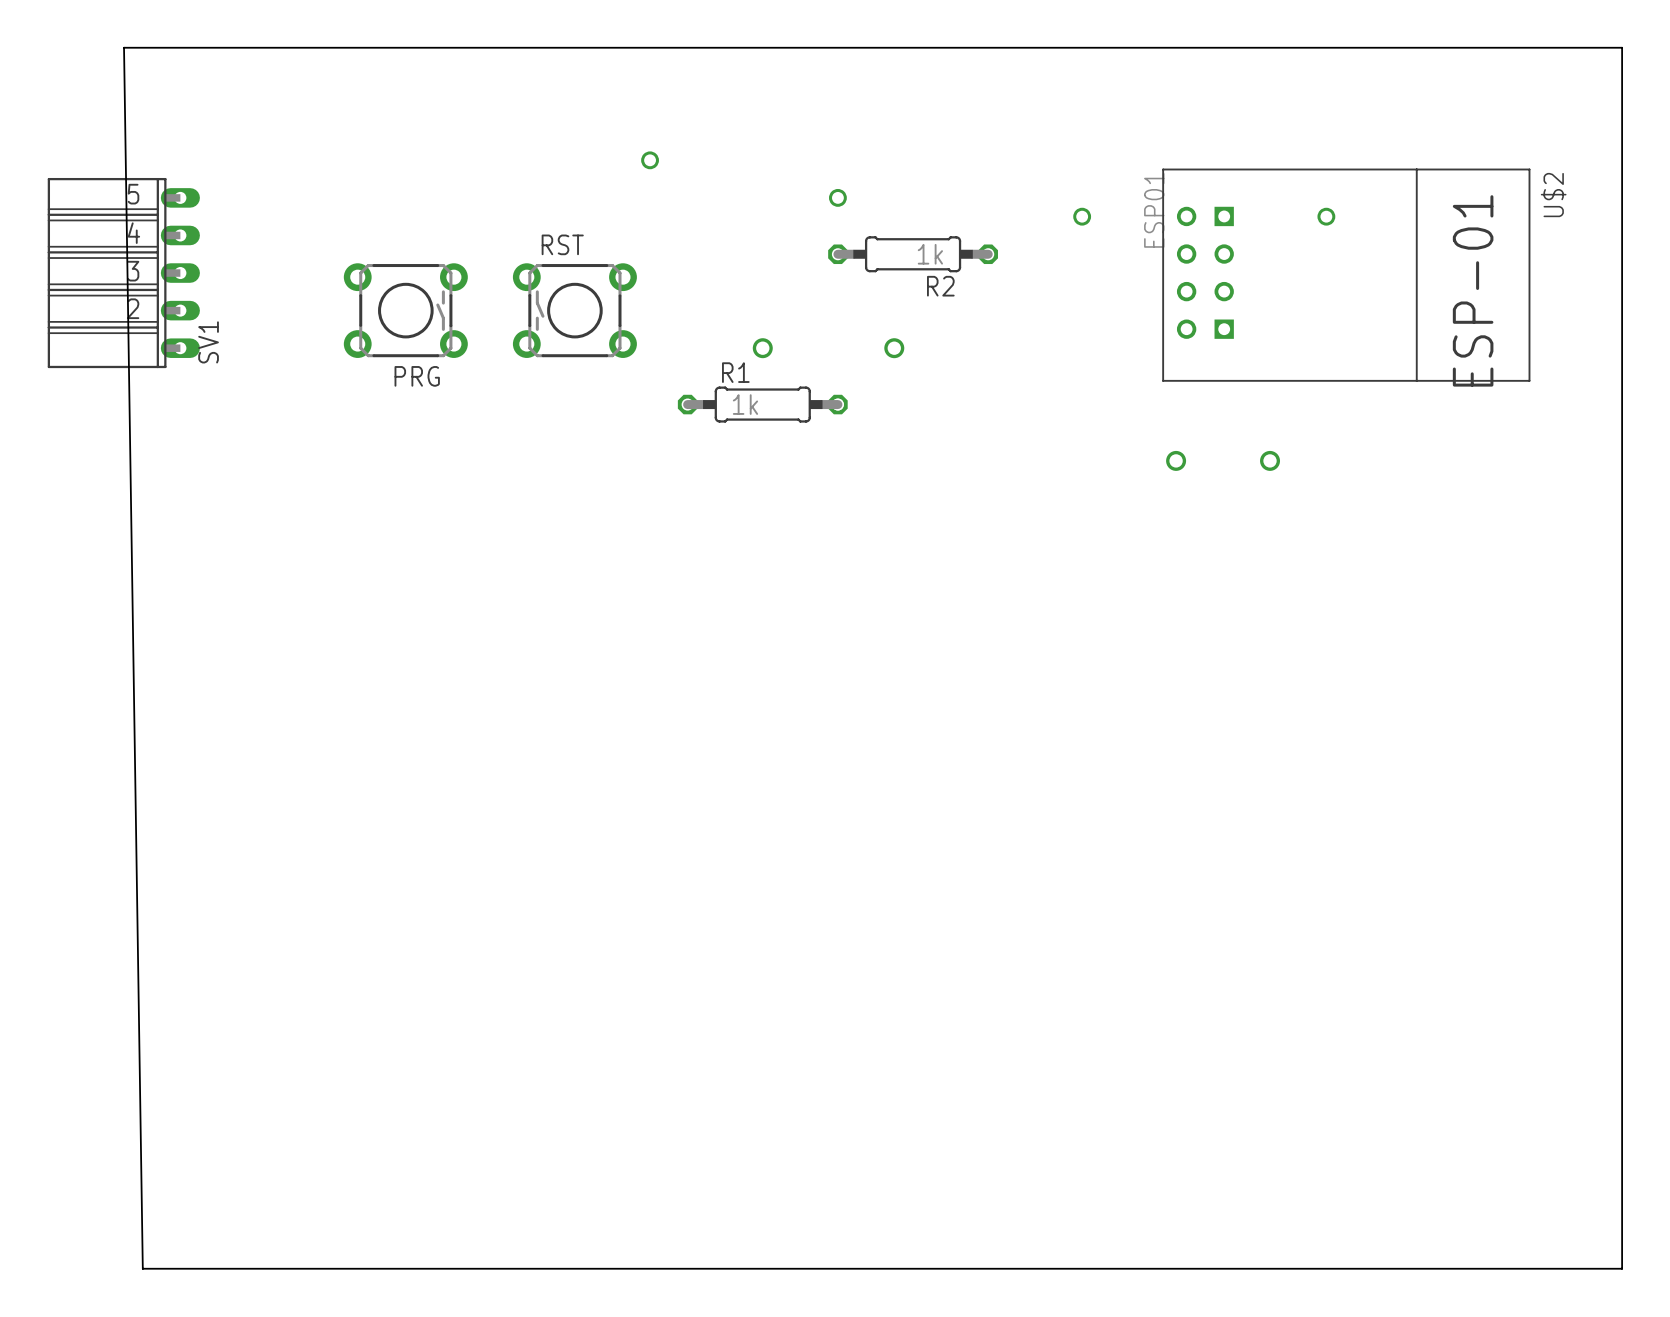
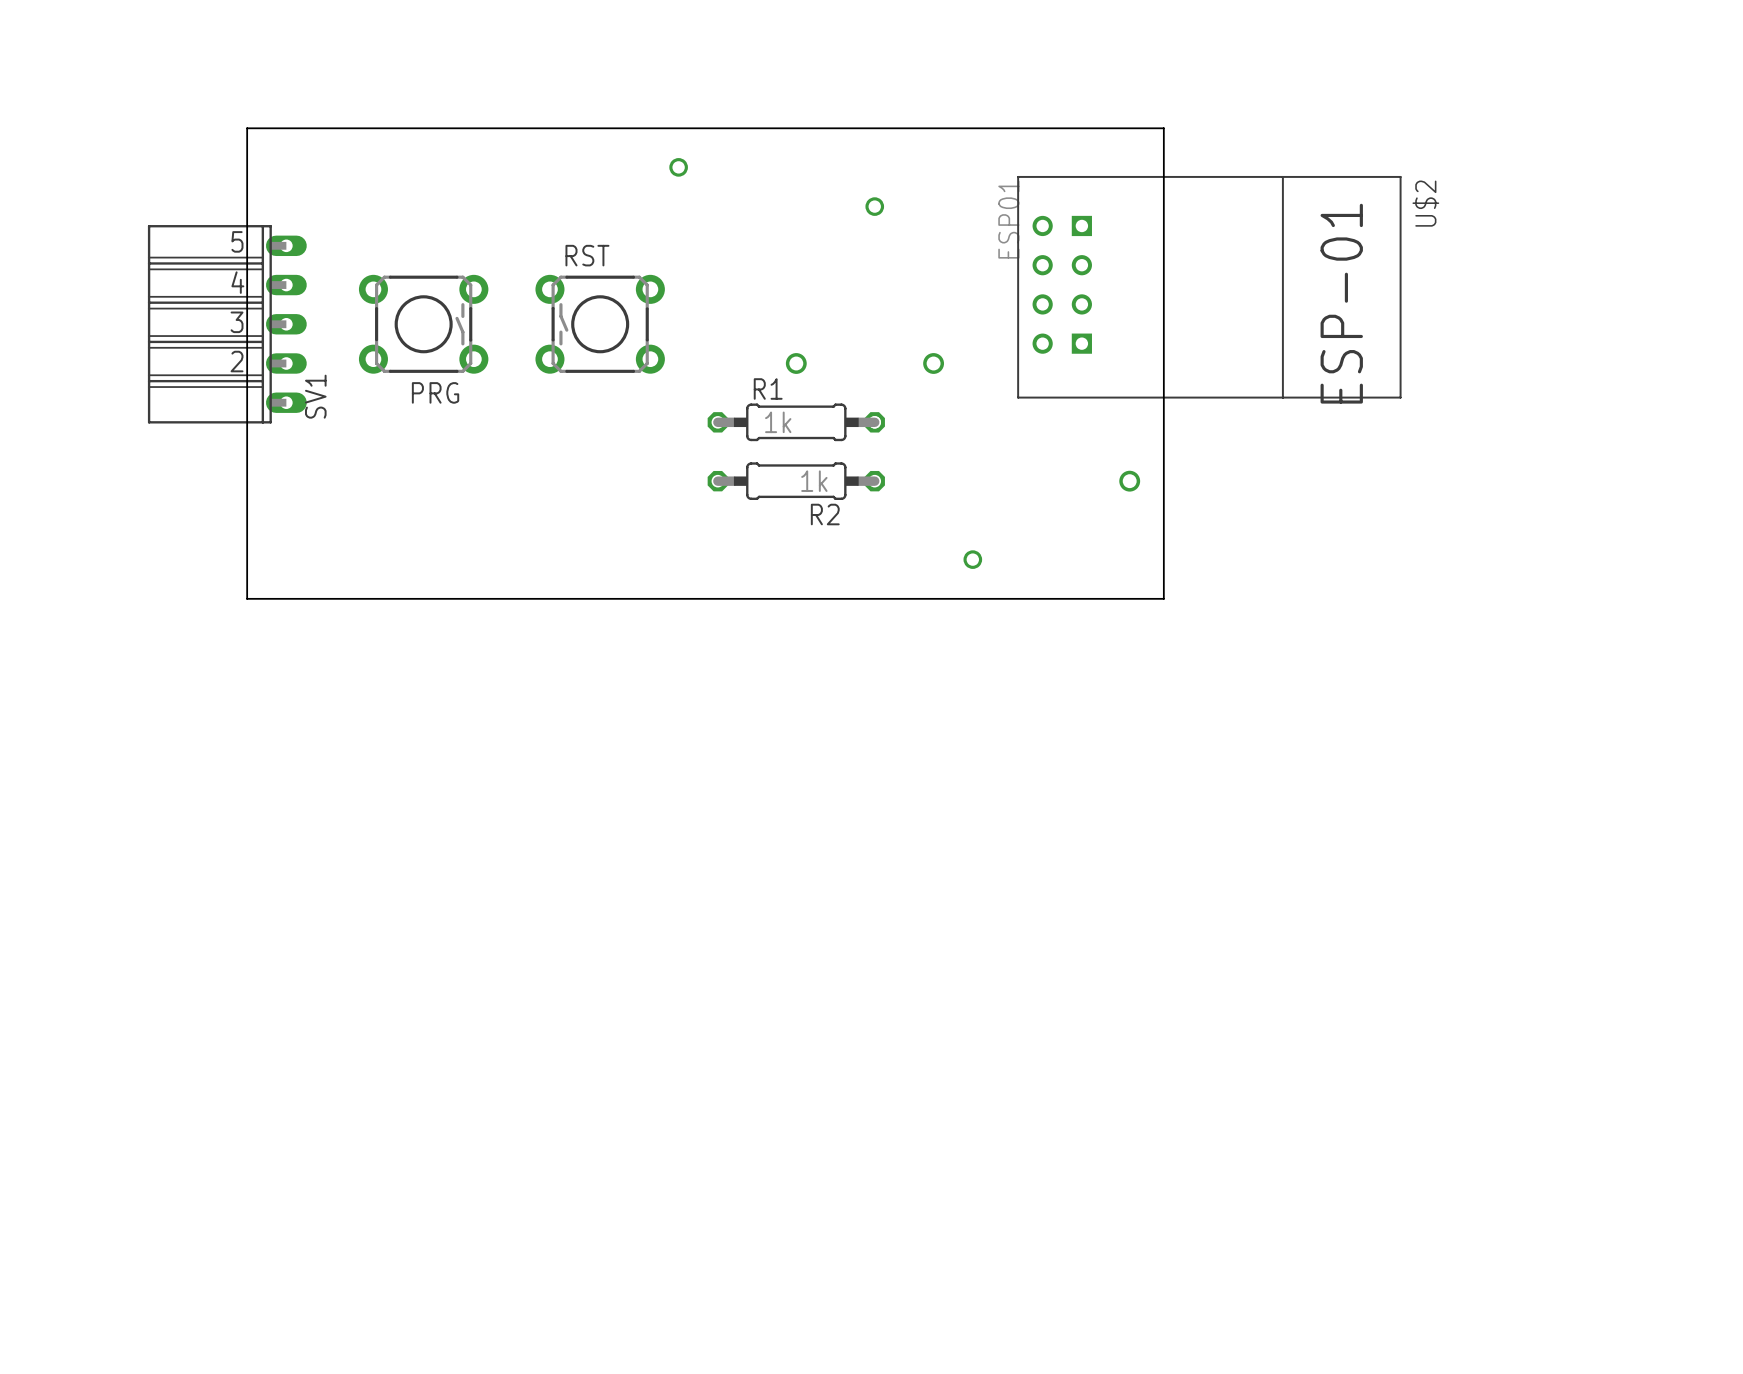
board edge: (124, 47) (1622, 47) (1622, 1268) (142, 1268) (124, 47) -> none
board edge: none -> (247, 128) (1163, 128) (1163, 598) (247, 598) (247, 128)
via: (1082, 216) -> none
via: (1326, 216) -> none
R2 position: (913, 254) -> (796, 481)
SV1 position: (123, 273) -> (227, 324)
U$2 position: (1346, 275) -> (1209, 287)
via: none -> (1129, 481)
via: (1176, 460) -> none
via: (1270, 460) -> none
via: none -> (972, 559)

